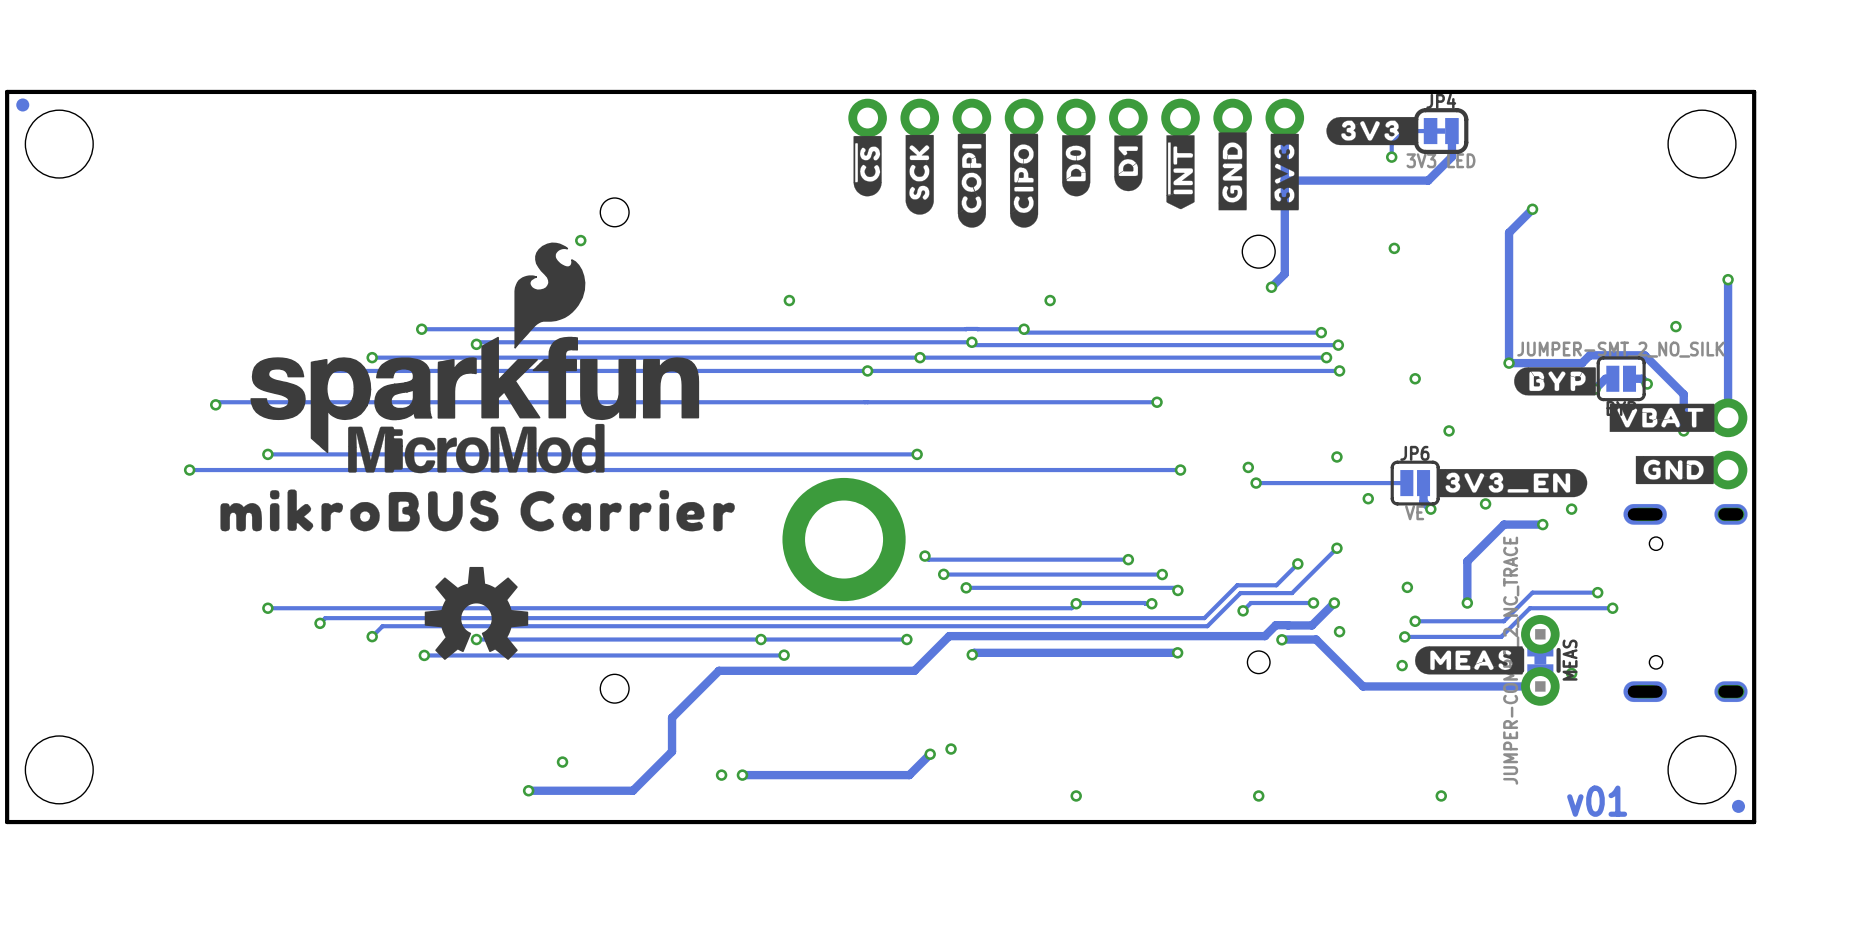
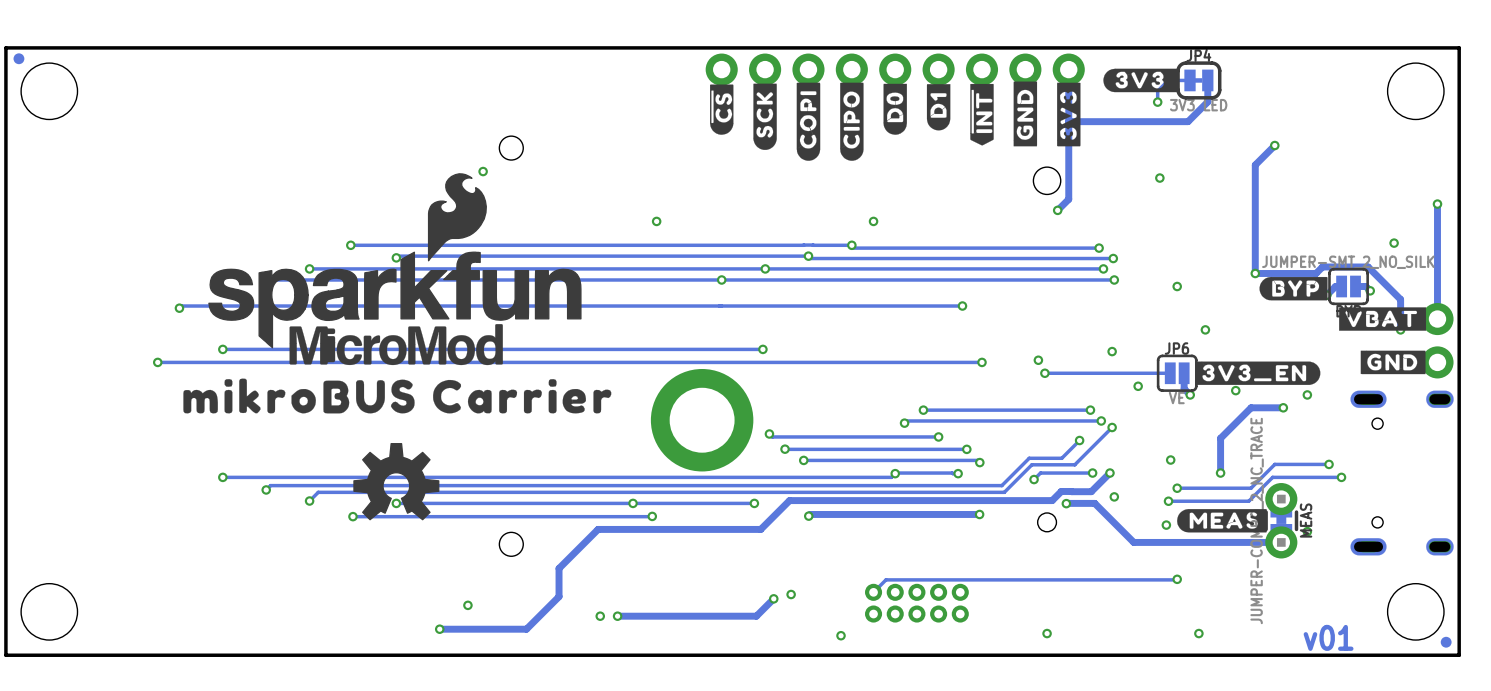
via: none -> (923, 410)
track: none -> (1090, 410) (923, 410)
via: none -> (1090, 410)
track: none -> (1101, 420) (906, 420) (904, 423)
via: none -> (1101, 420)
via: none -> (904, 423)
track: none -> (1177, 579) (885, 579) (873, 592)
via: none -> (1177, 579)
part: none -> (916, 603)
via position: (1076, 795) -> (841, 635)

